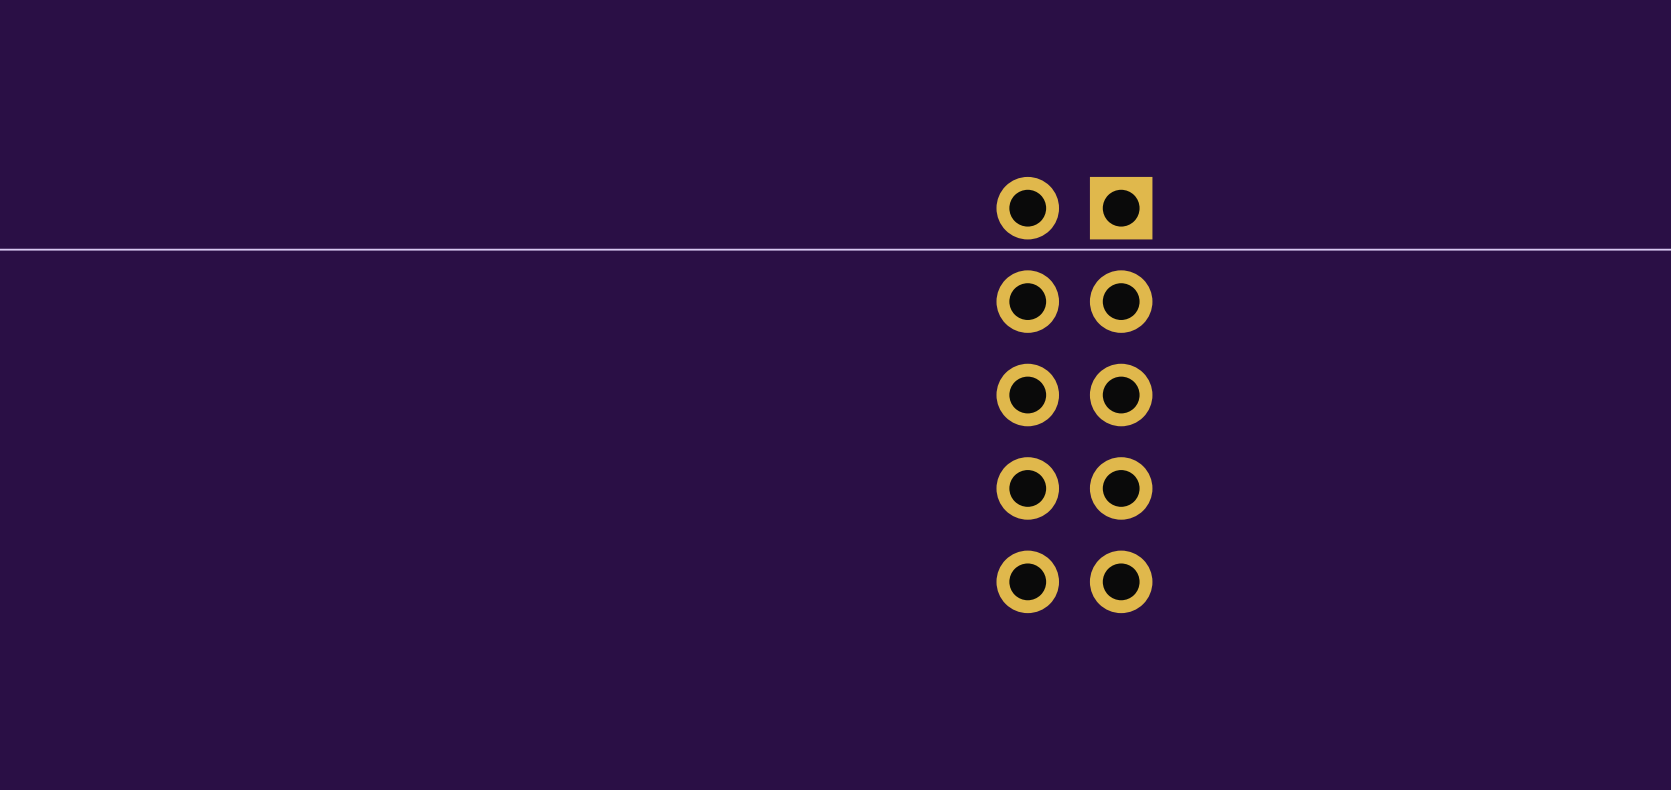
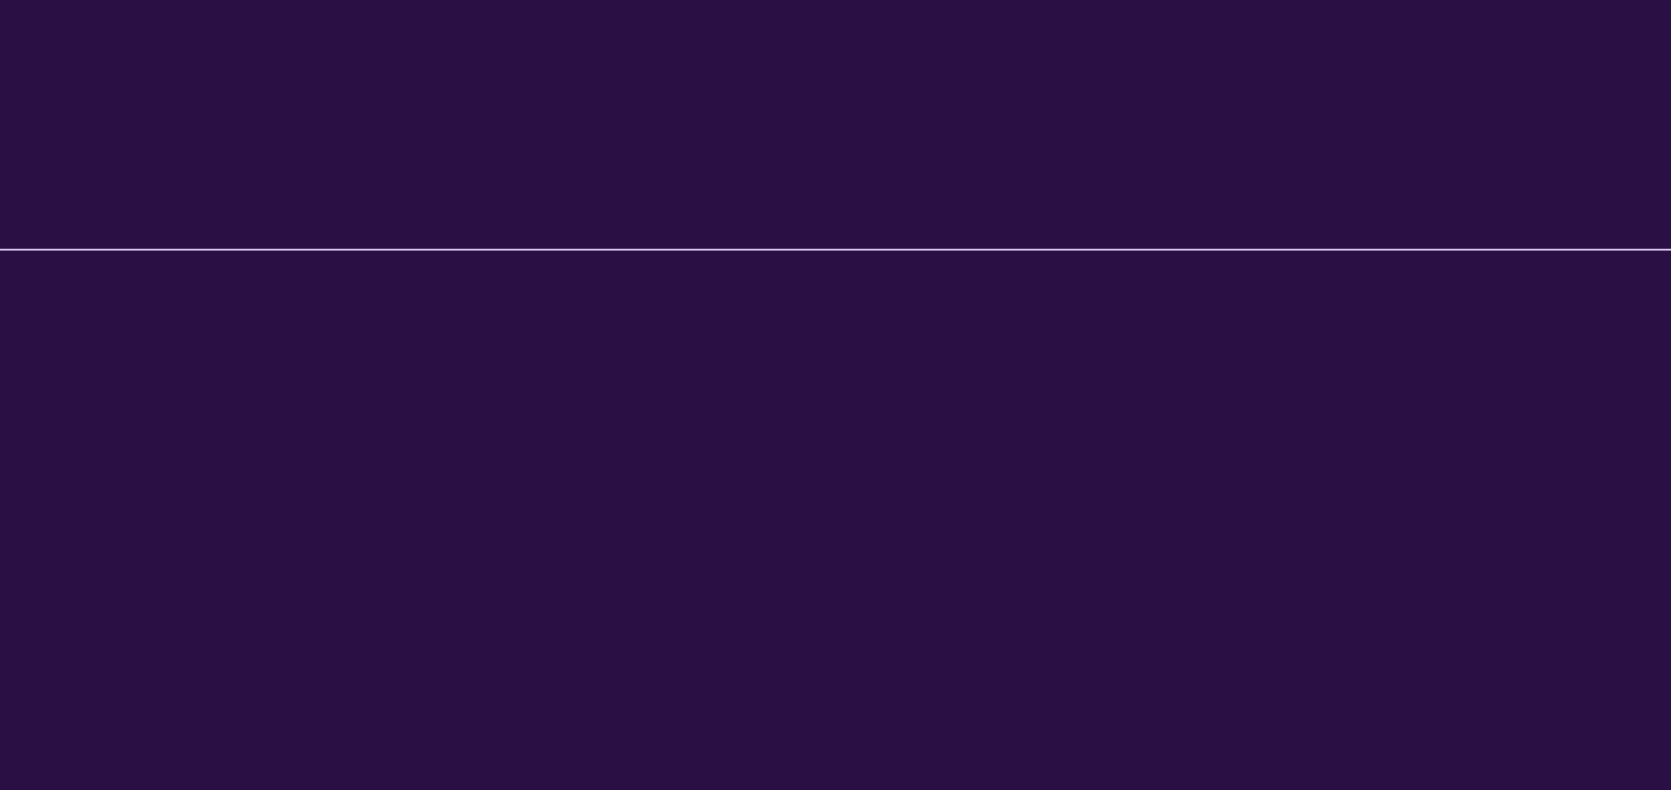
part: (1074, 395) -> none

